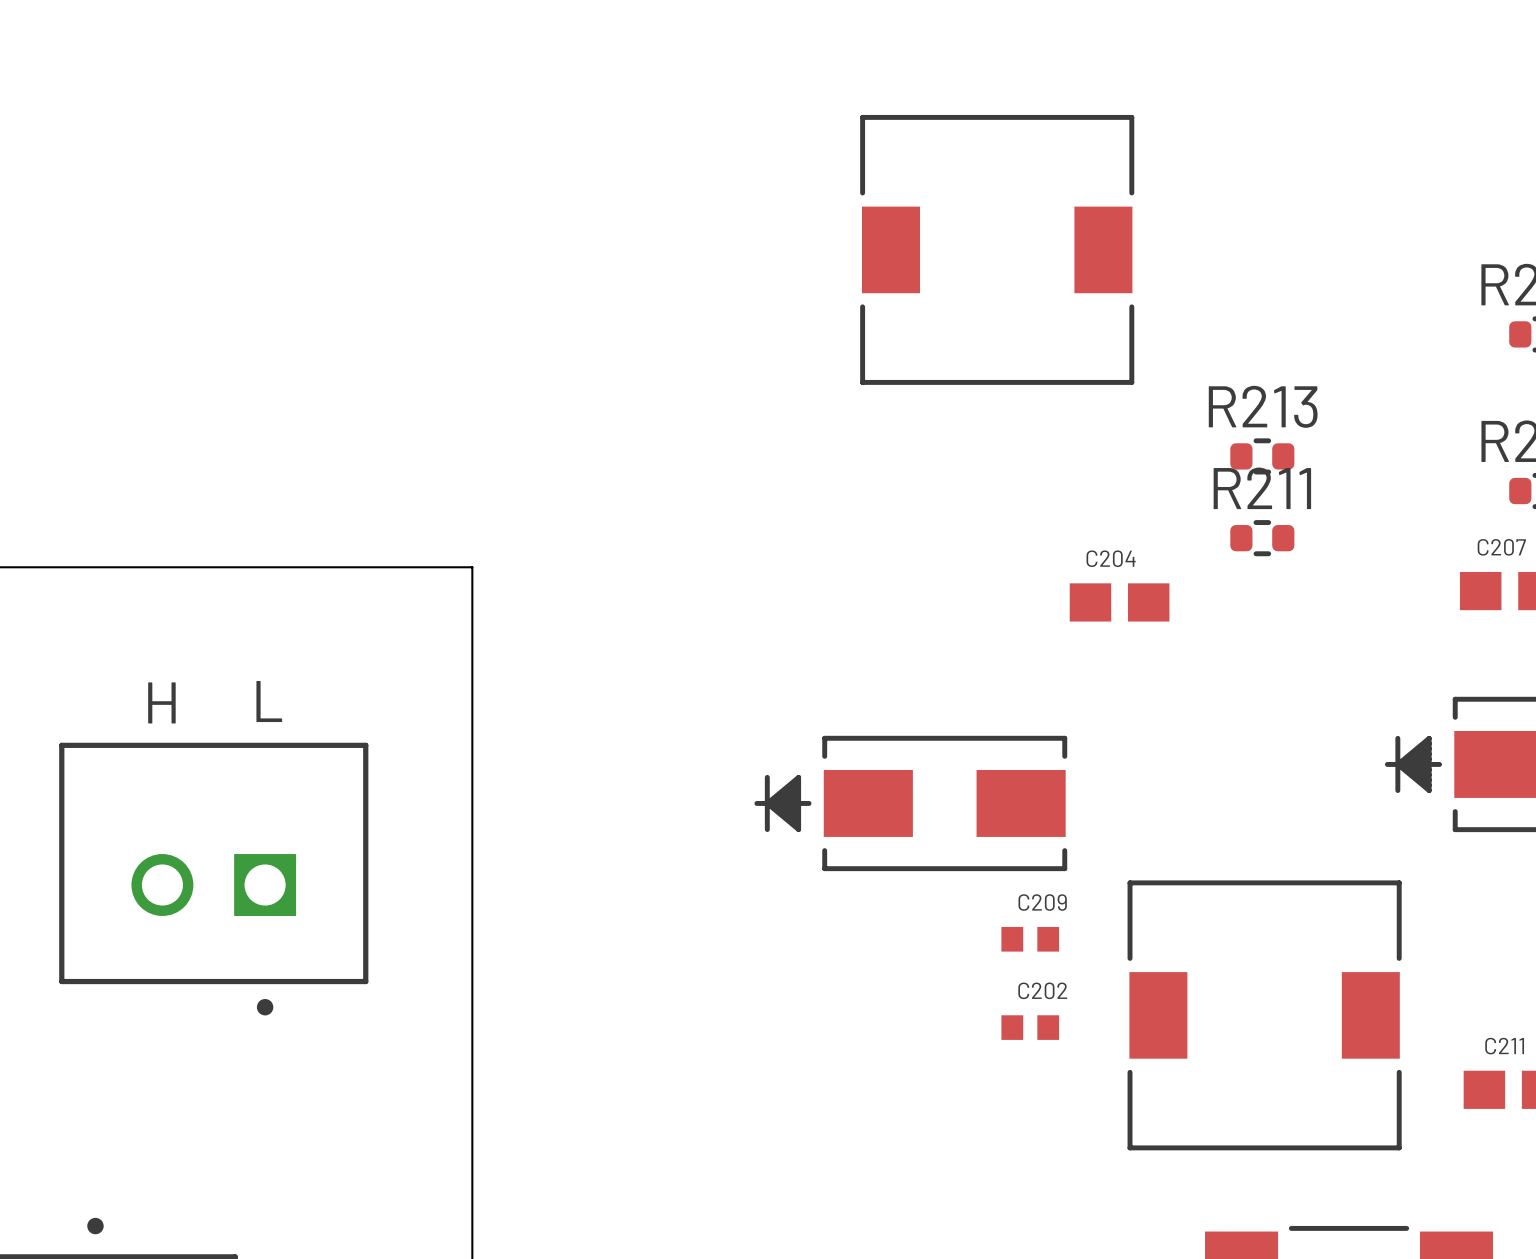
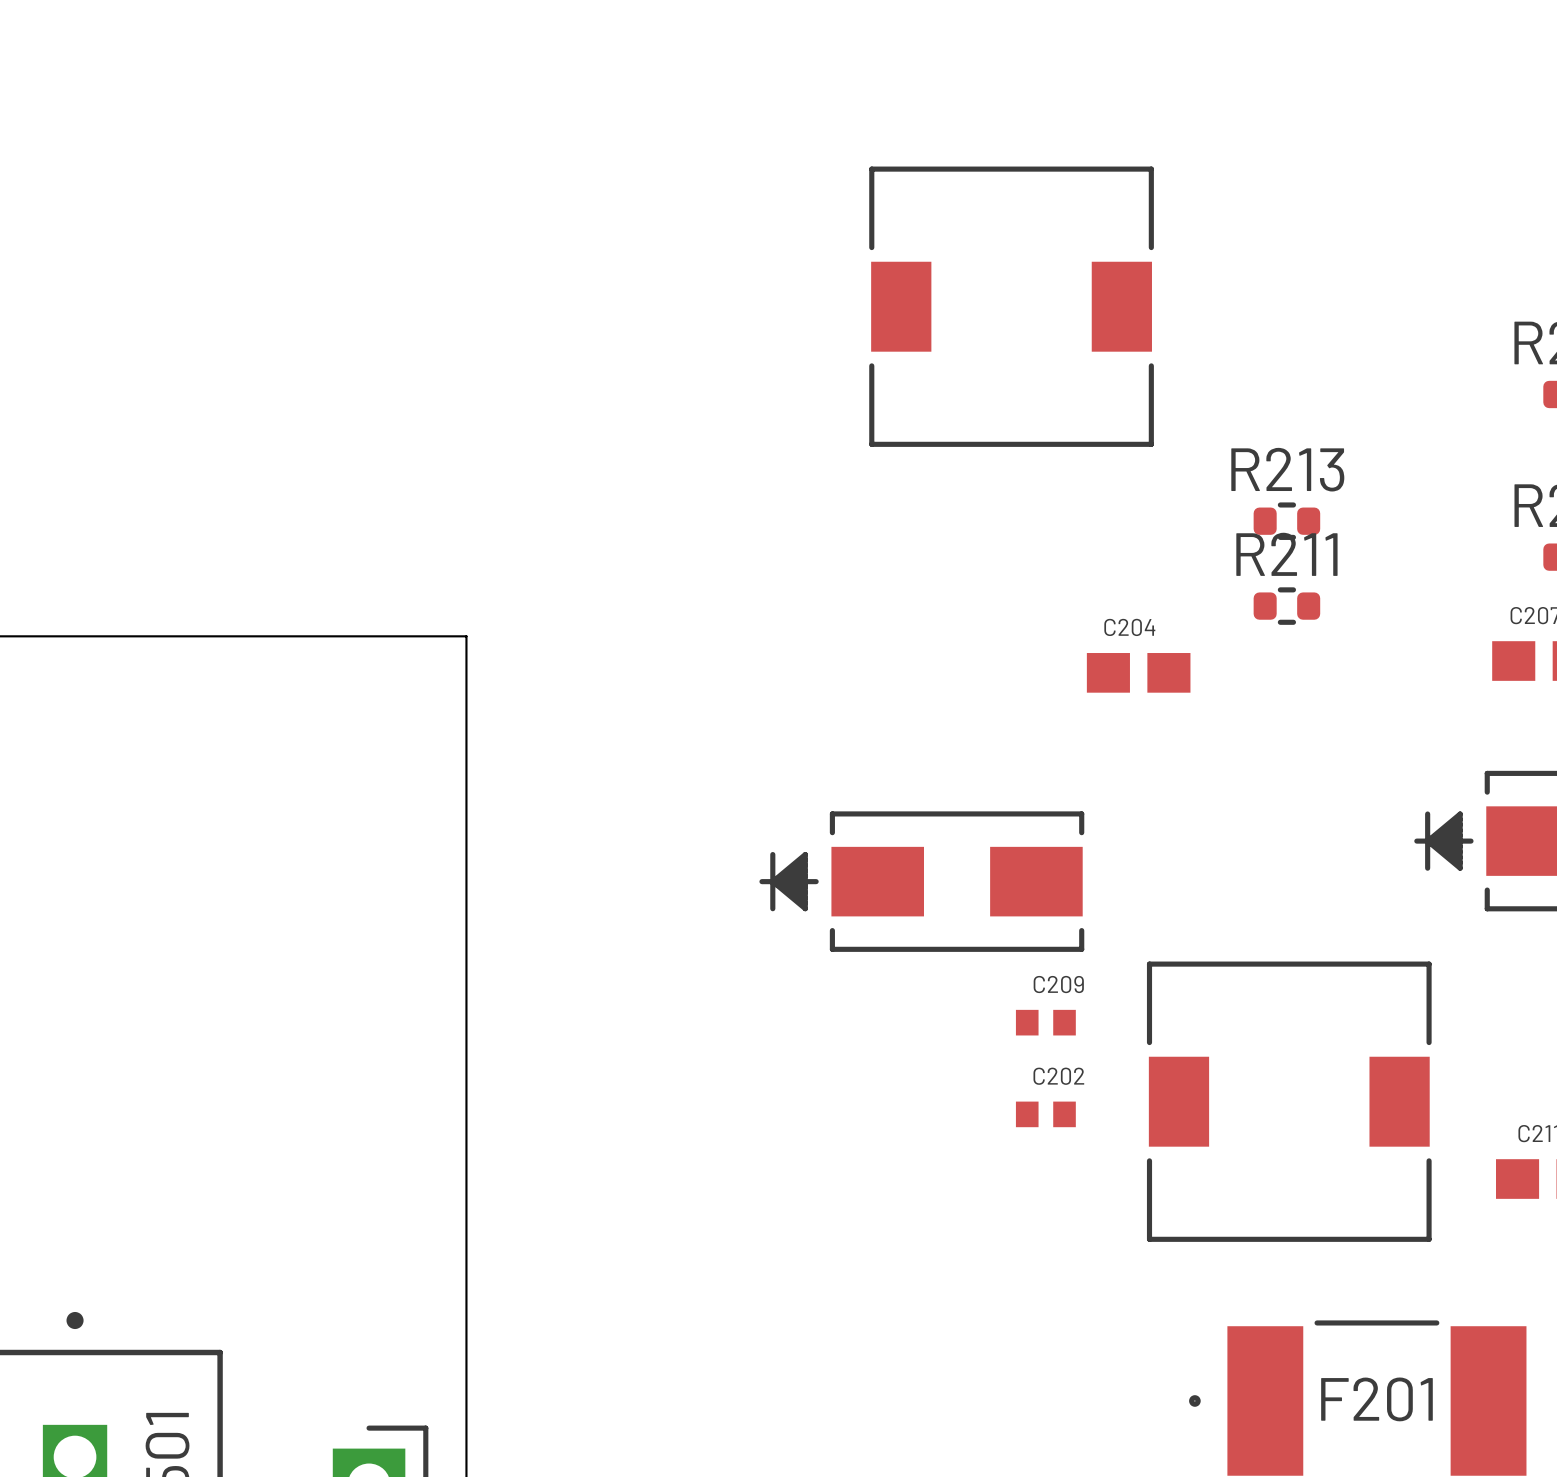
text: L (269, 701) -> none
text: H (161, 702) -> none
part: (213, 879) -> none

